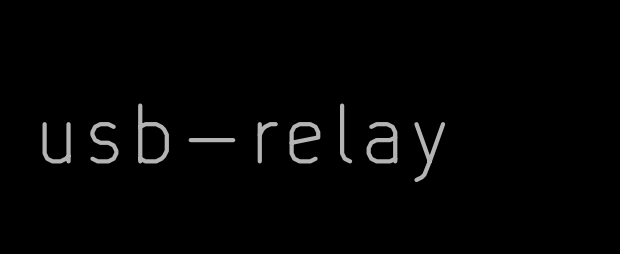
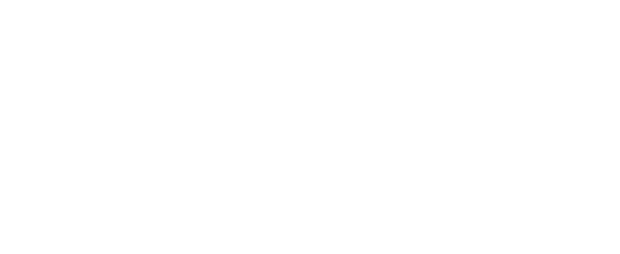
label: usb-relay (243, 142) -> none

